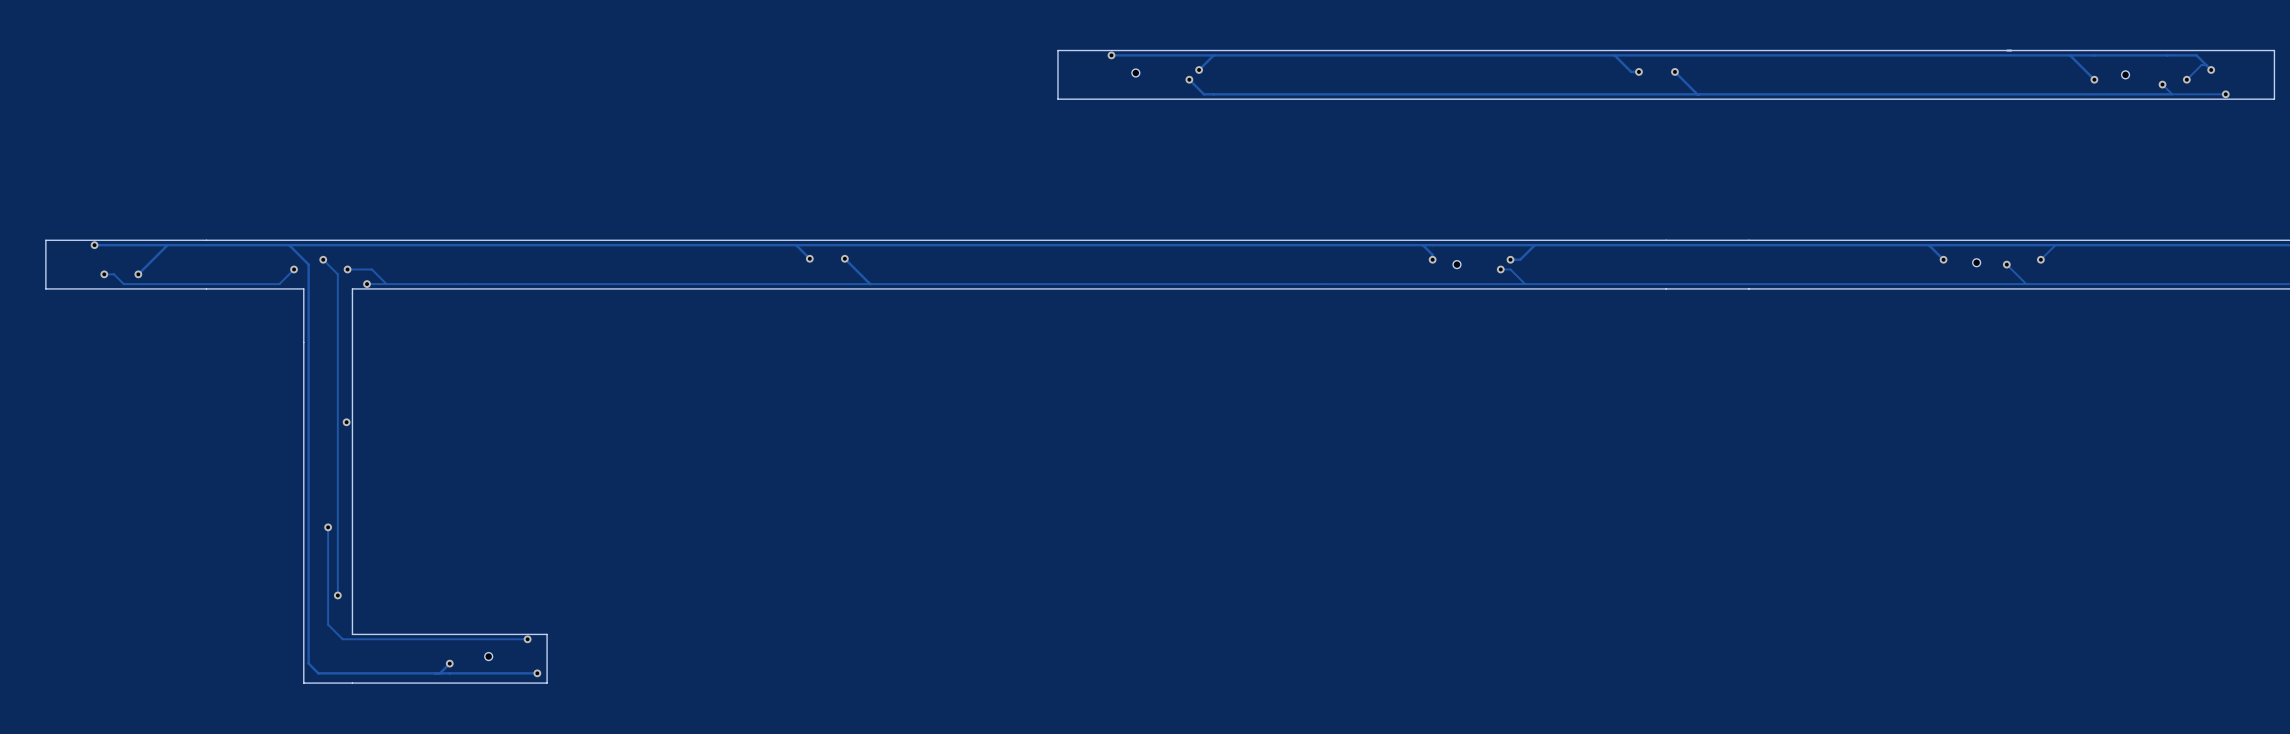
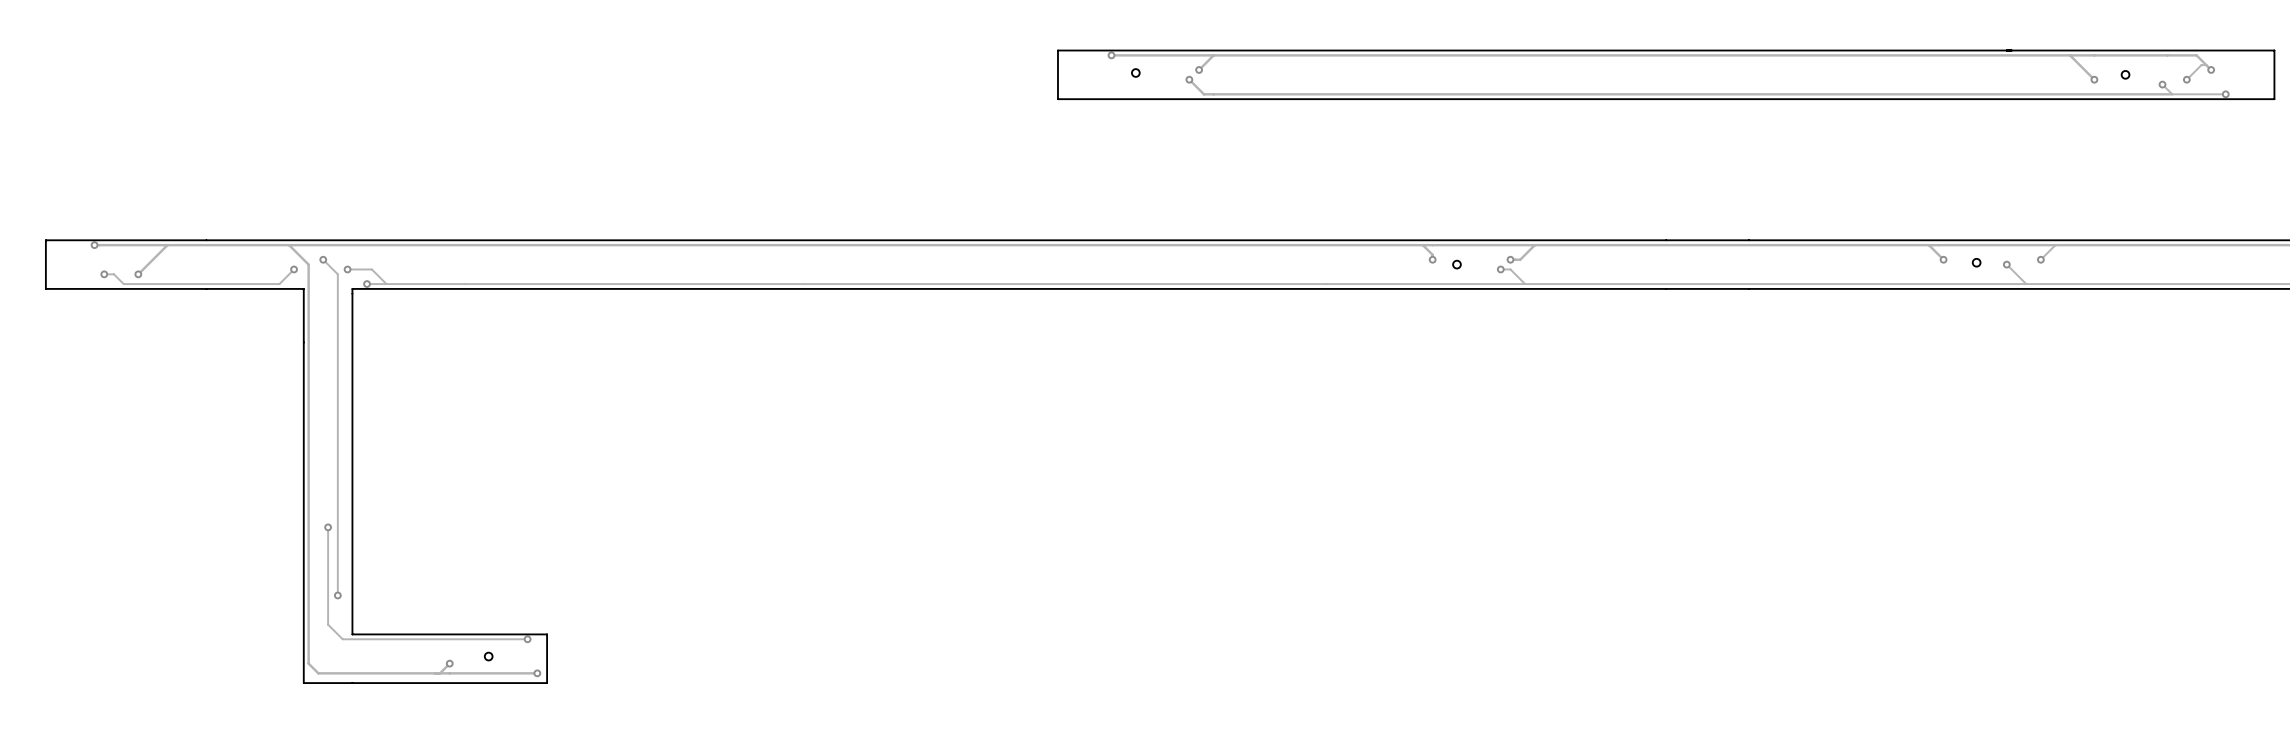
track: (1614, 55) (1631, 71) (1638, 71) -> none
via: (1638, 71) -> none
track: (1674, 71) (1697, 94) -> none
via: (1674, 71) -> none
track: (796, 245) (809, 258) -> none
via: (809, 258) -> none
track: (844, 258) (871, 284) -> none
via: (844, 258) -> none
via: (346, 422) -> none

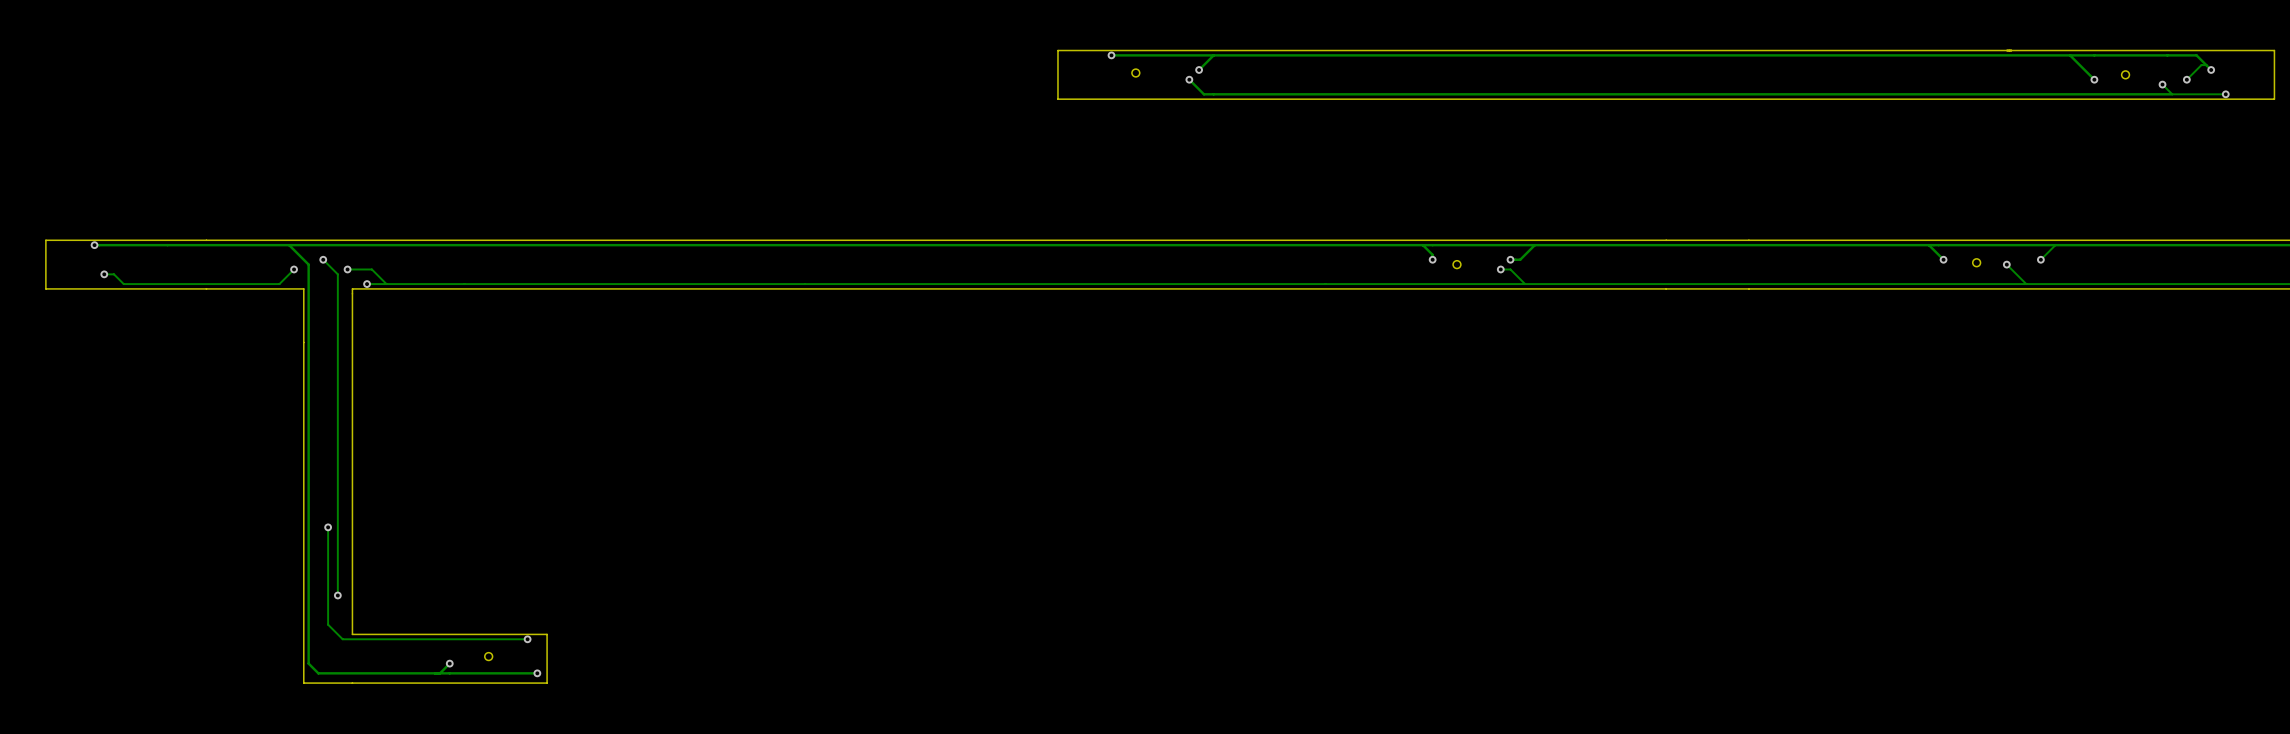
track: (167, 245) (138, 274) -> none
via: (138, 274) -> none

